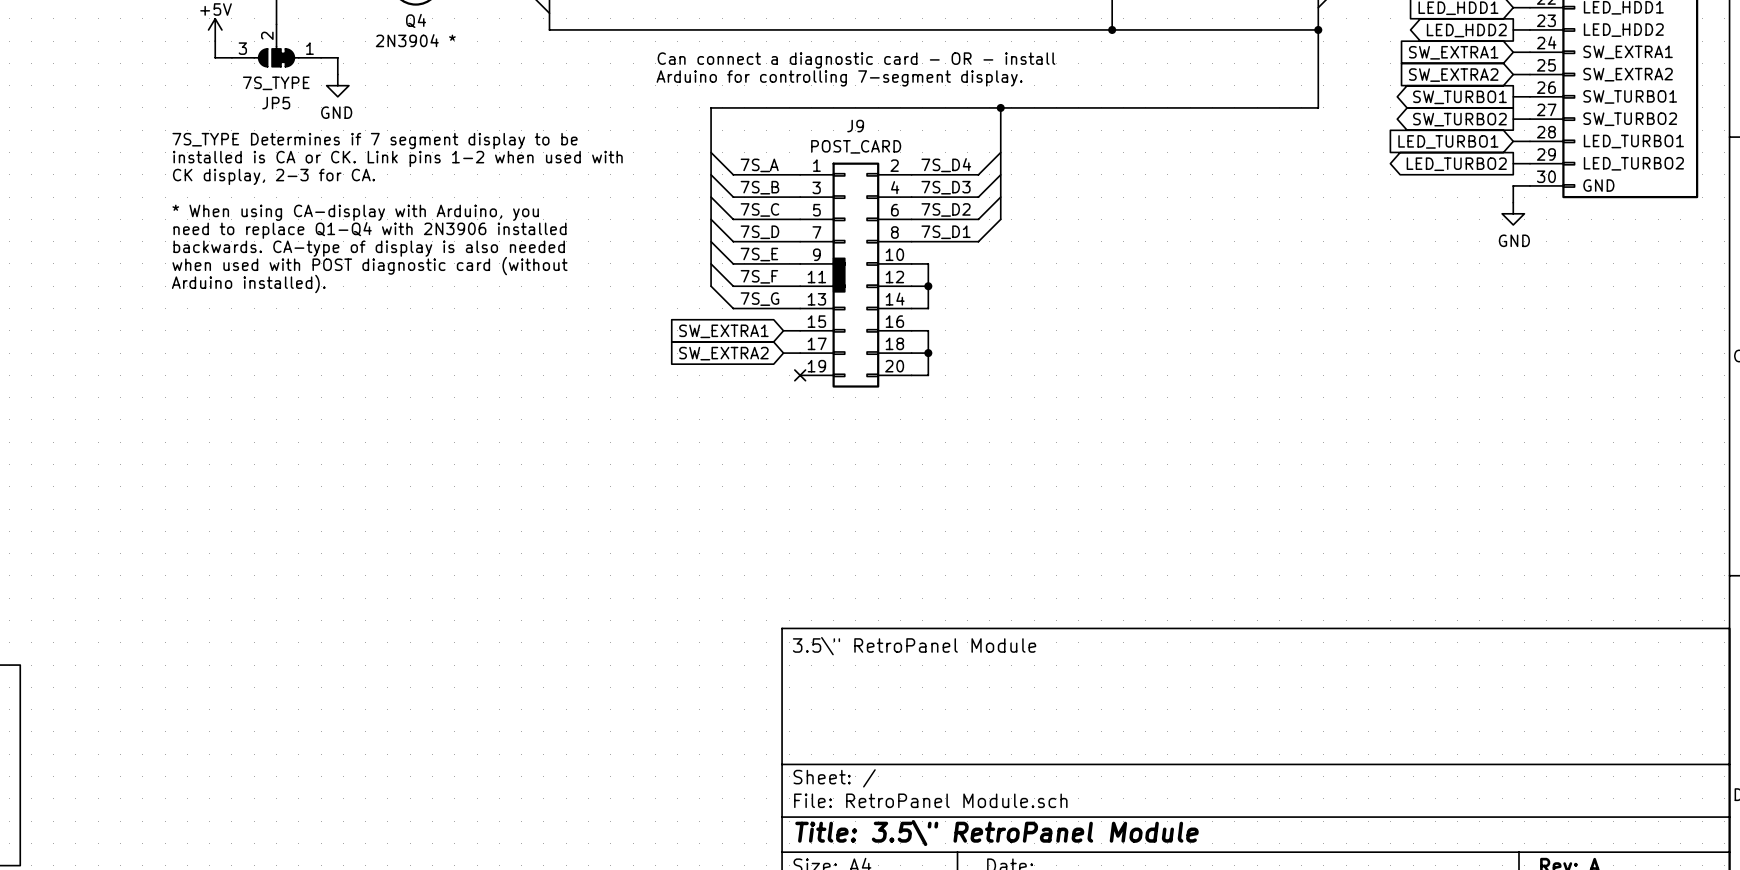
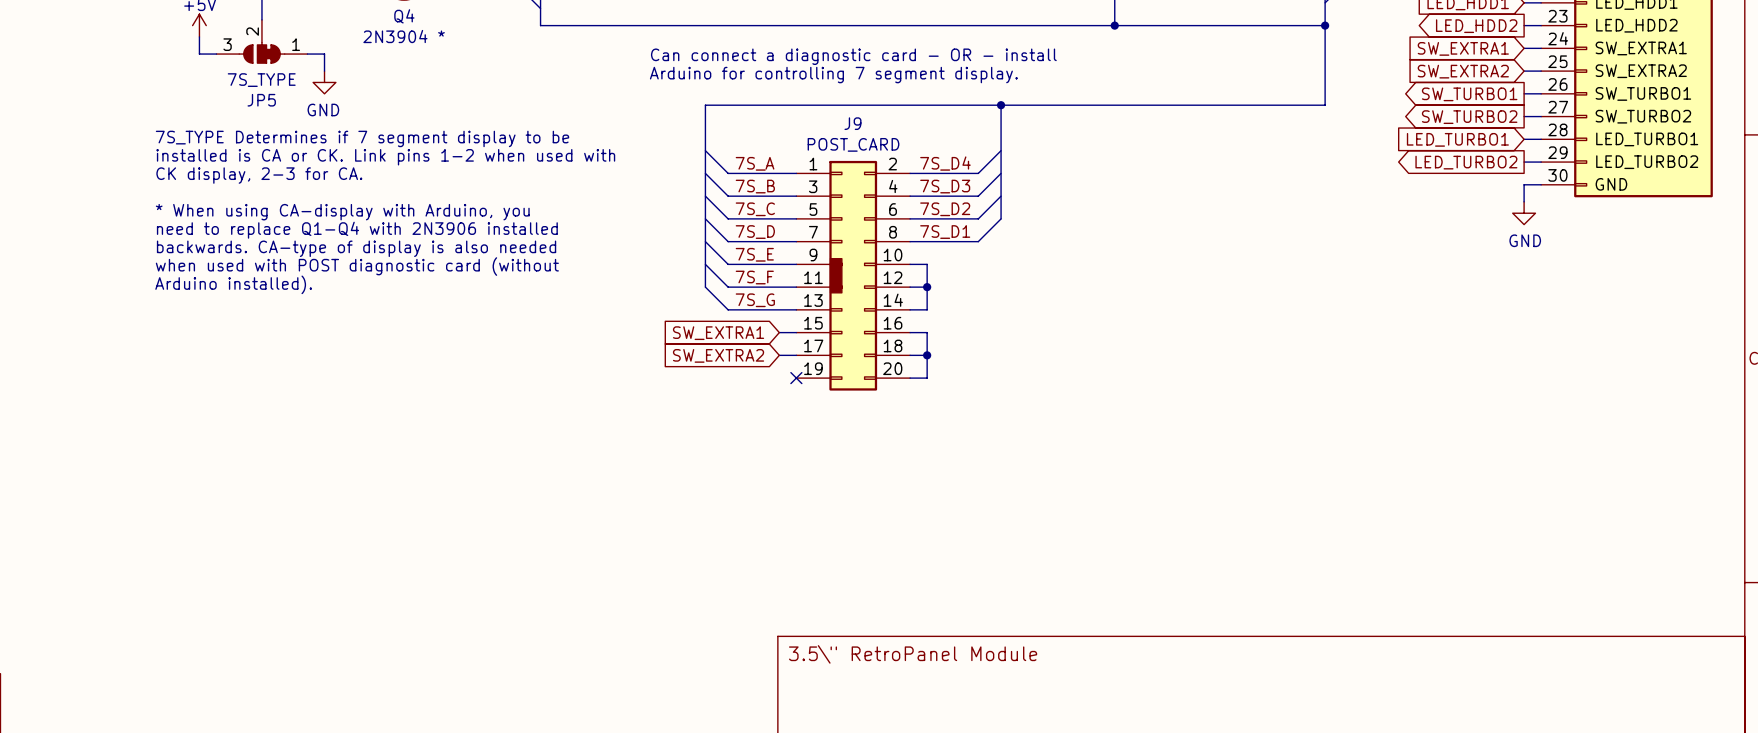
text: Arduino for controlling 7-segment display. (839, 78) -> Arduino for controlling 7 segment display. (833, 75)

